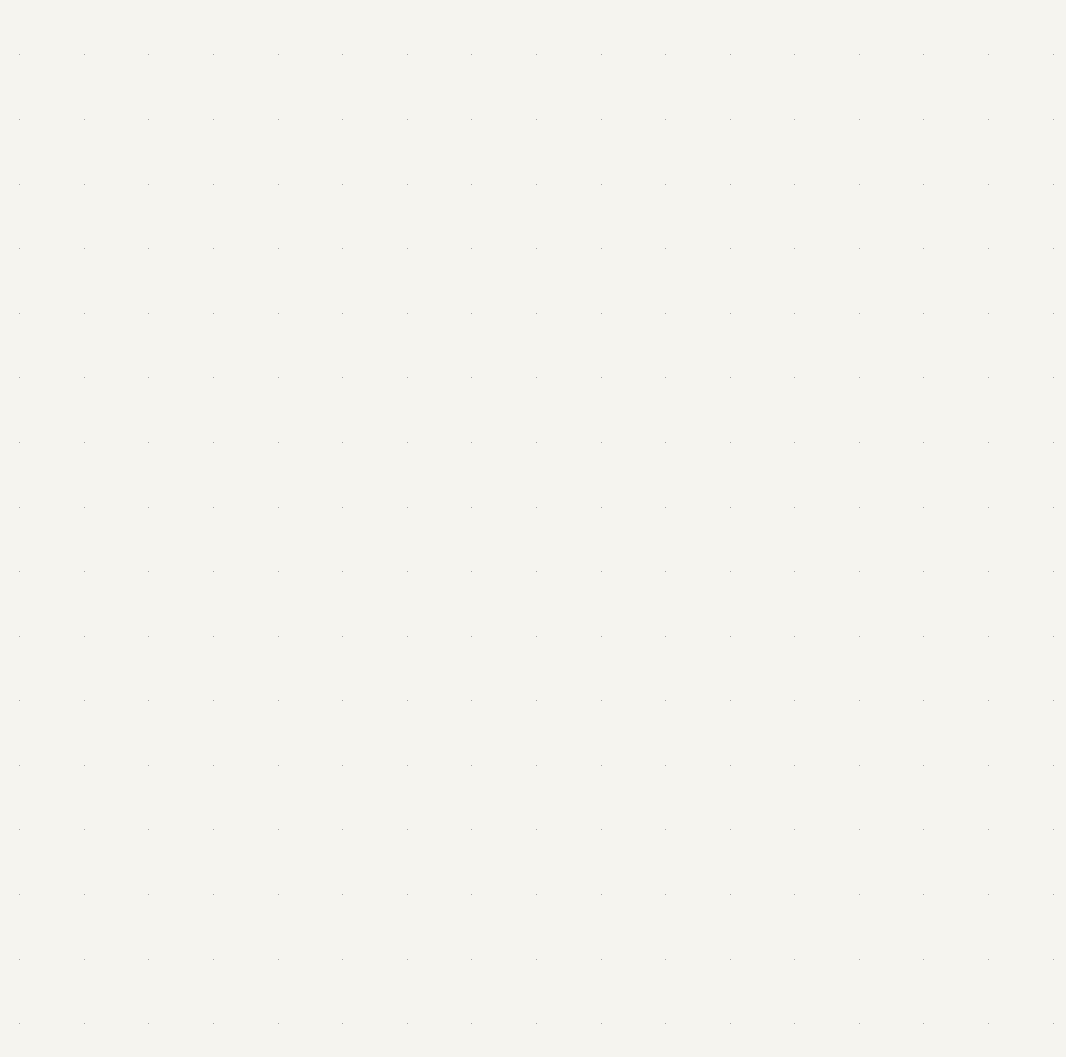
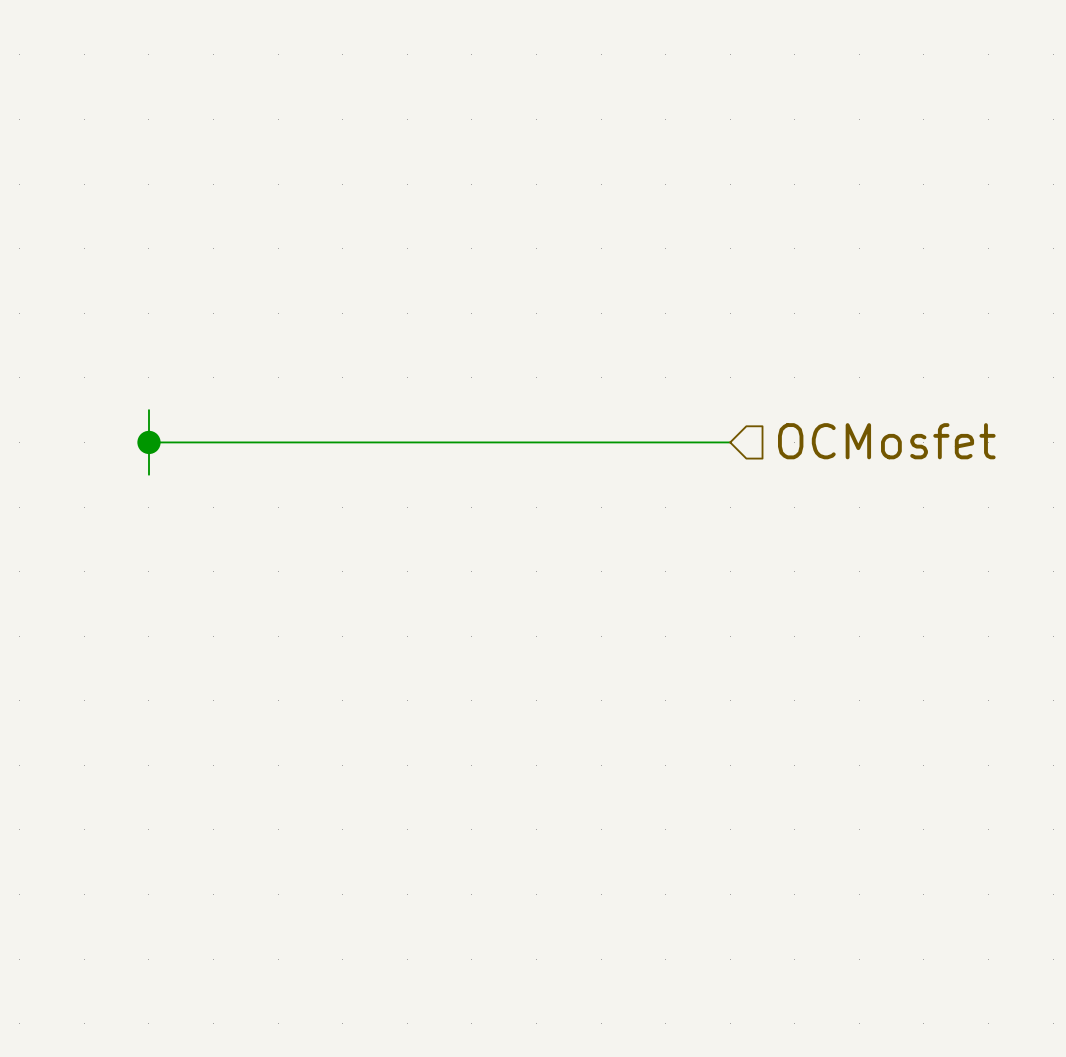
wire: none -> (148, 410) (148, 474)
hierarchical label: none -> OCMosfet (886, 441)
wire: none -> (148, 442) (730, 442)
junction: none -> (148, 442)

